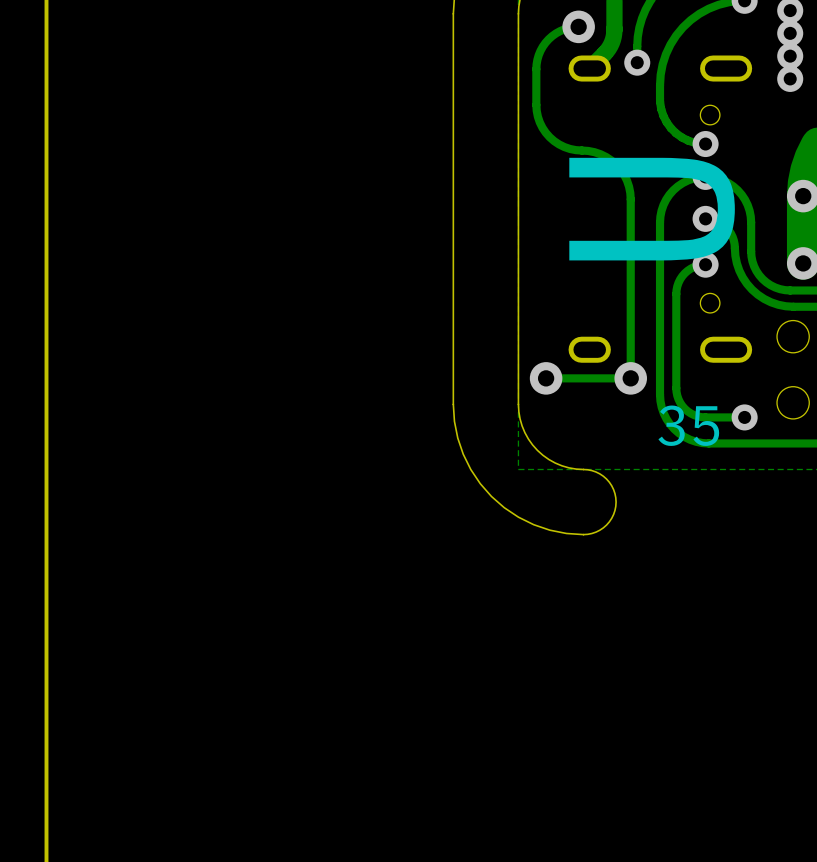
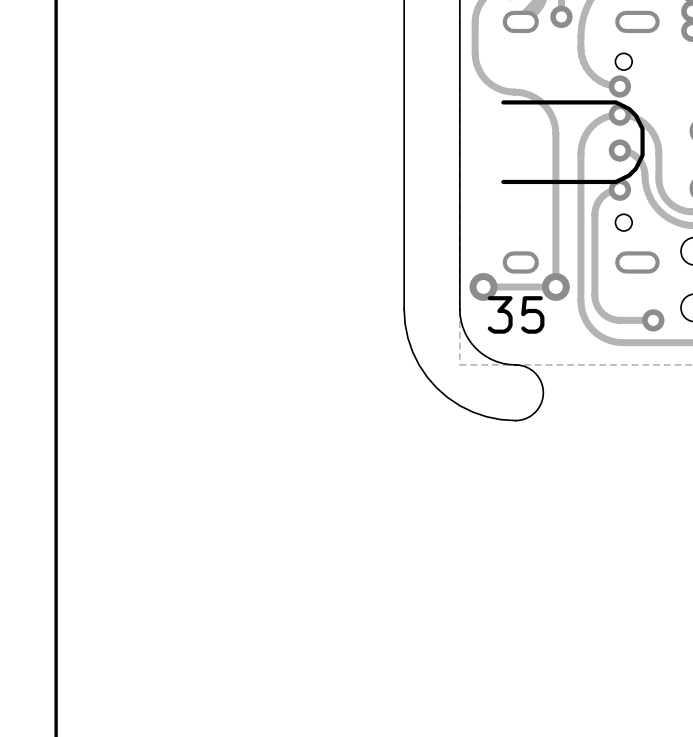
text position: 35 (688, 425) -> 35 (516, 314)

